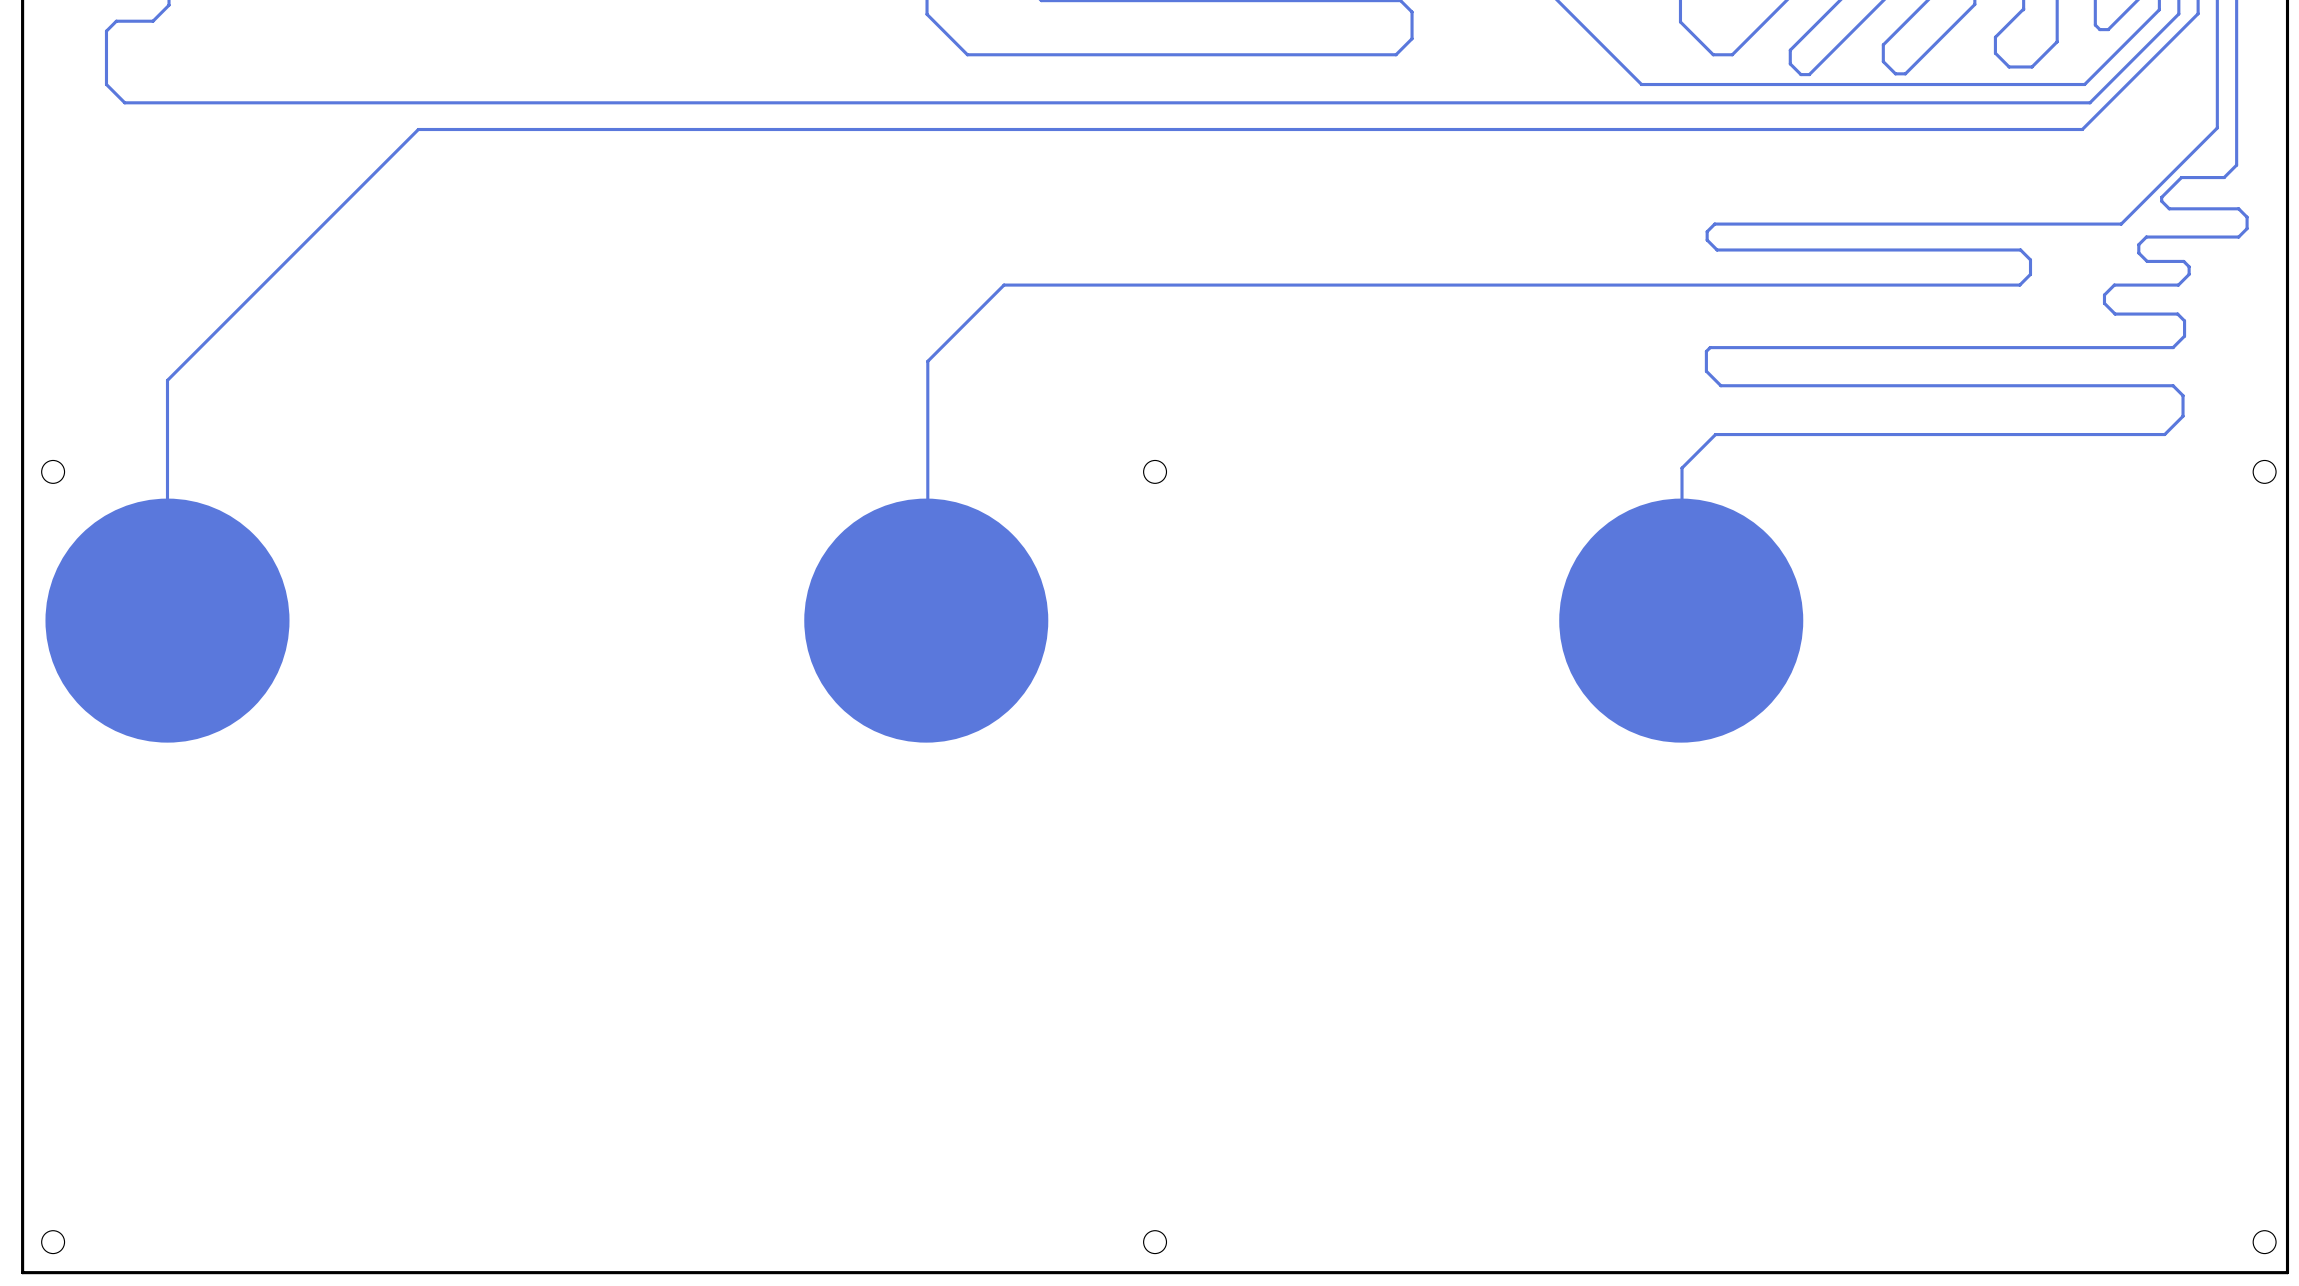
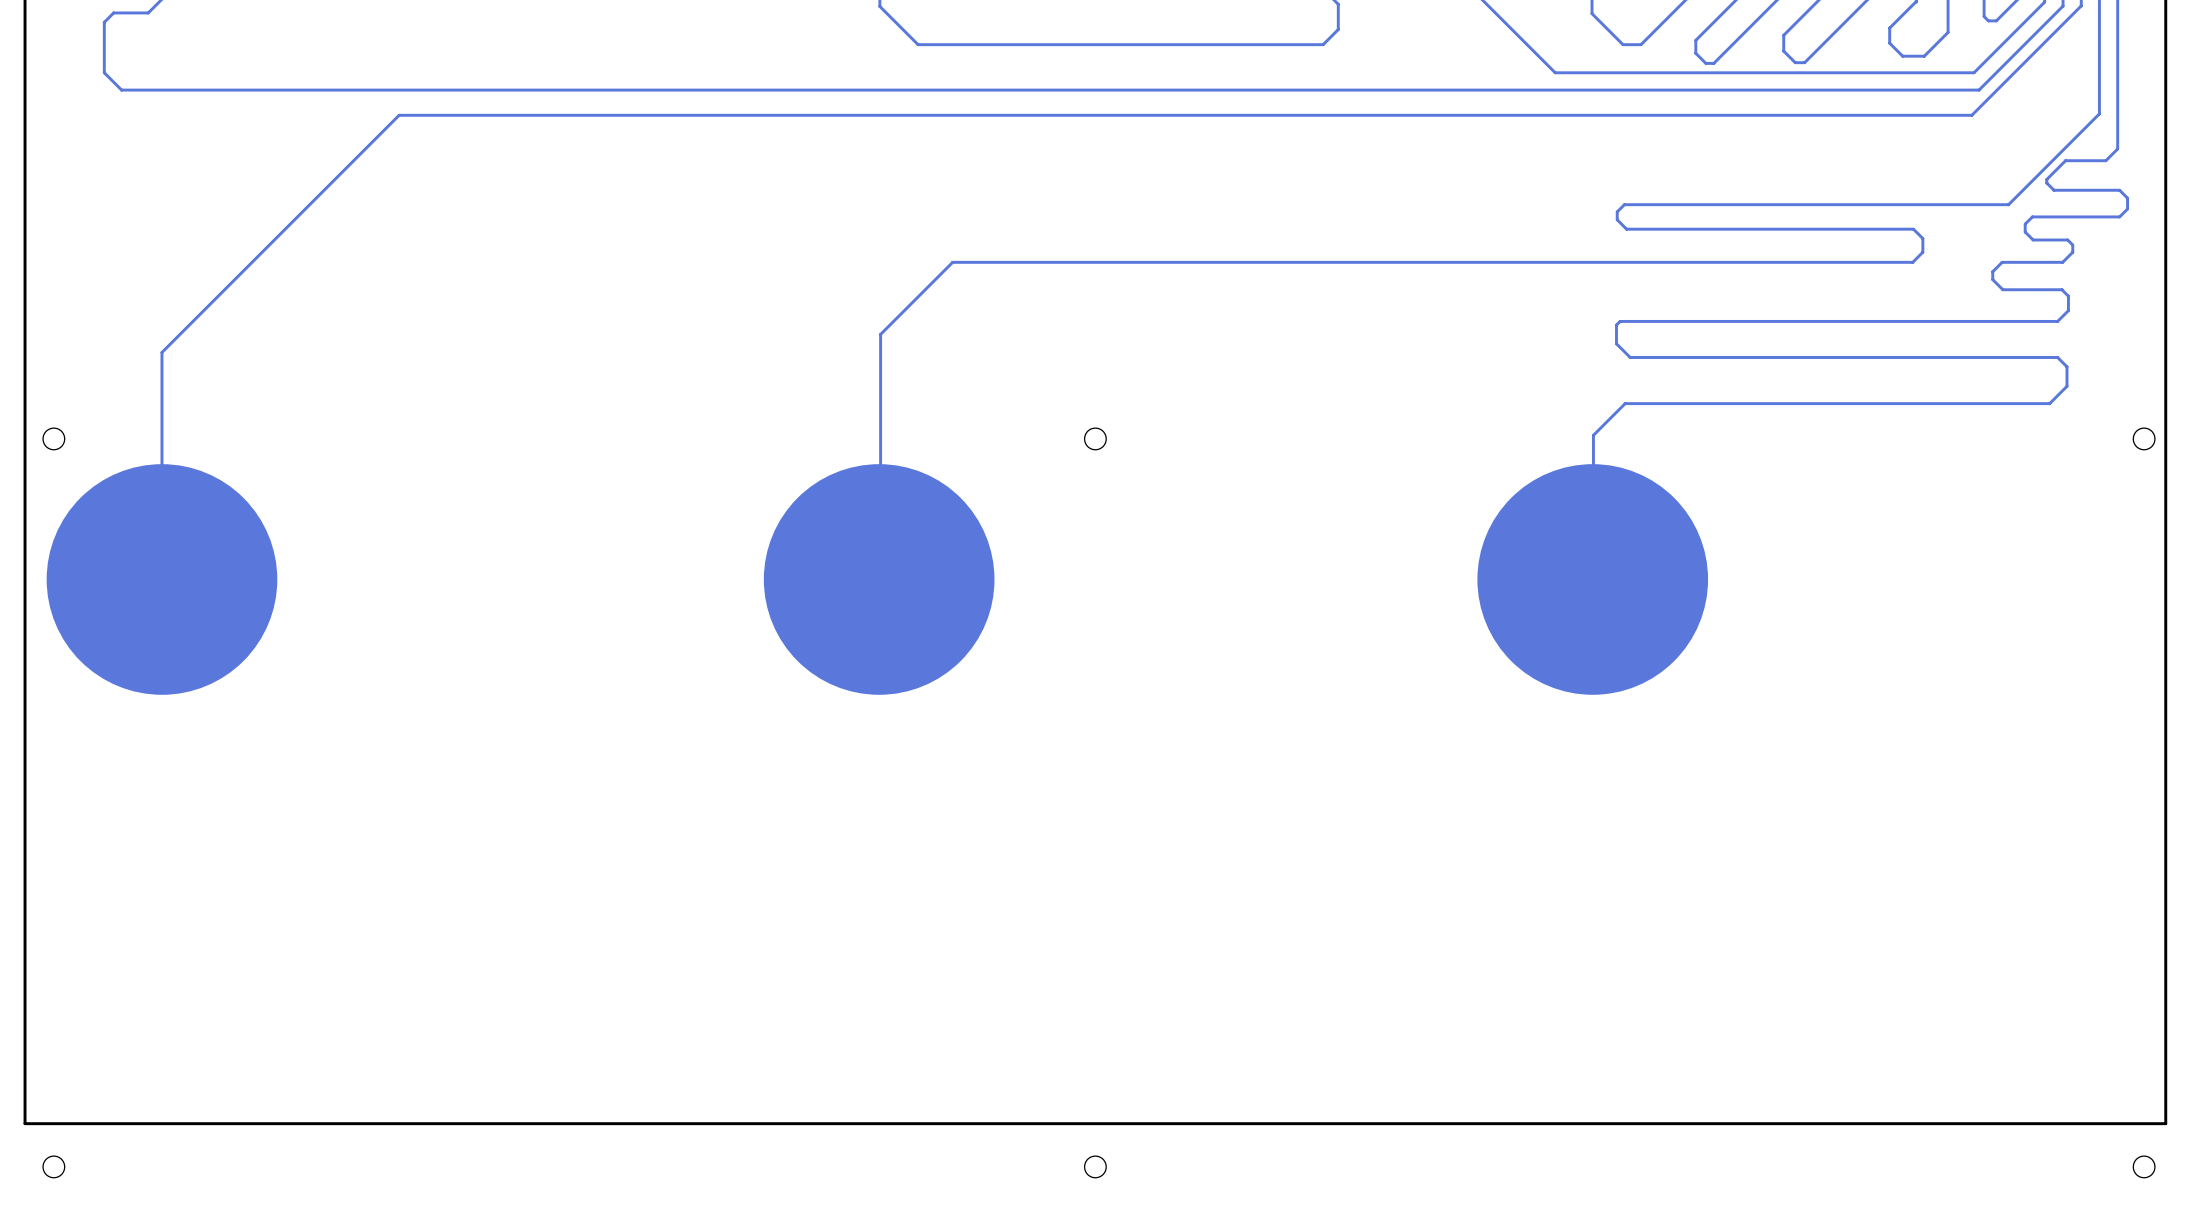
board edge: (22, 1196) (22, 1272) (2287, 1272) (2287, 1196) -> (25, 1123) (2165, 1123)

